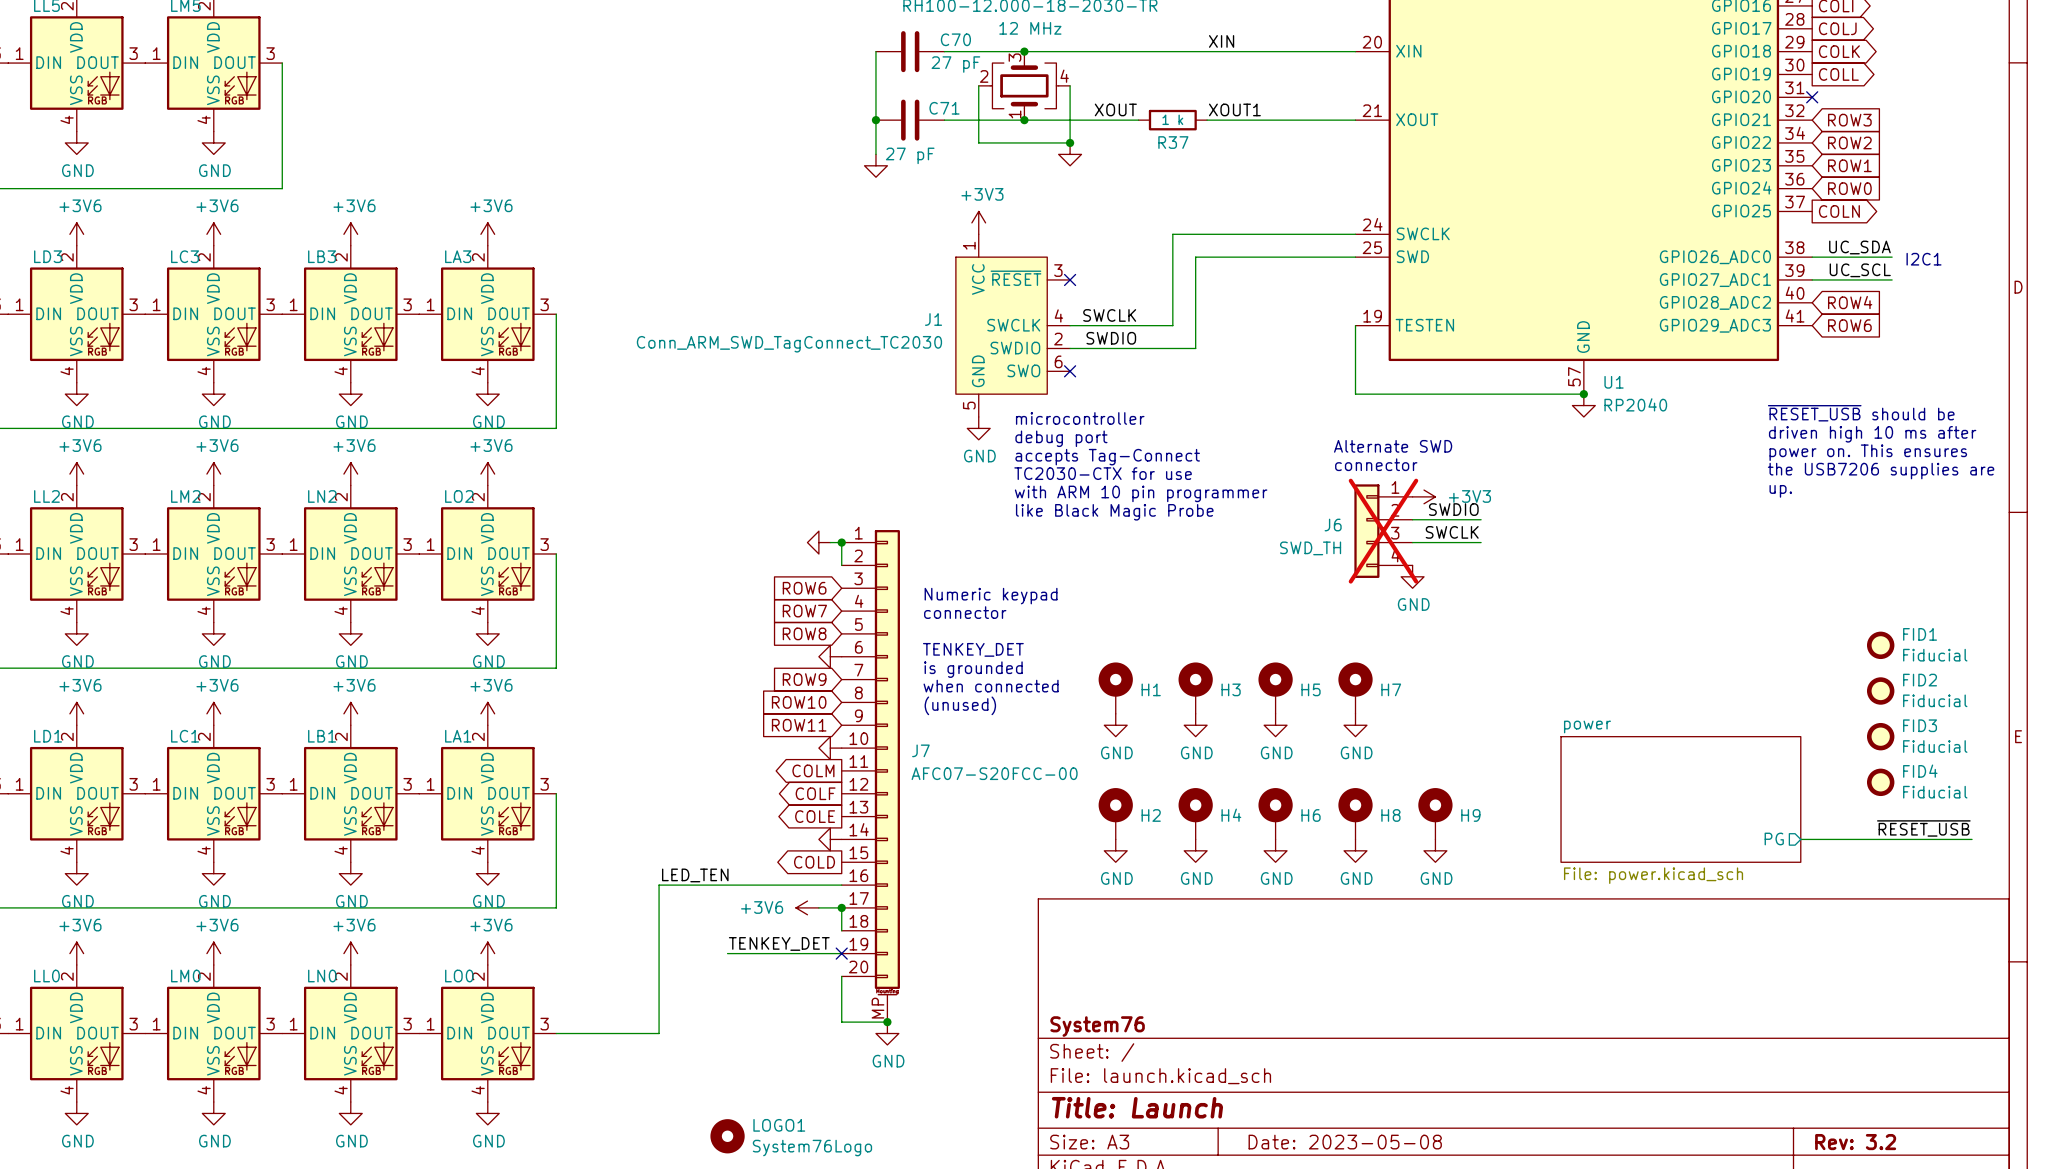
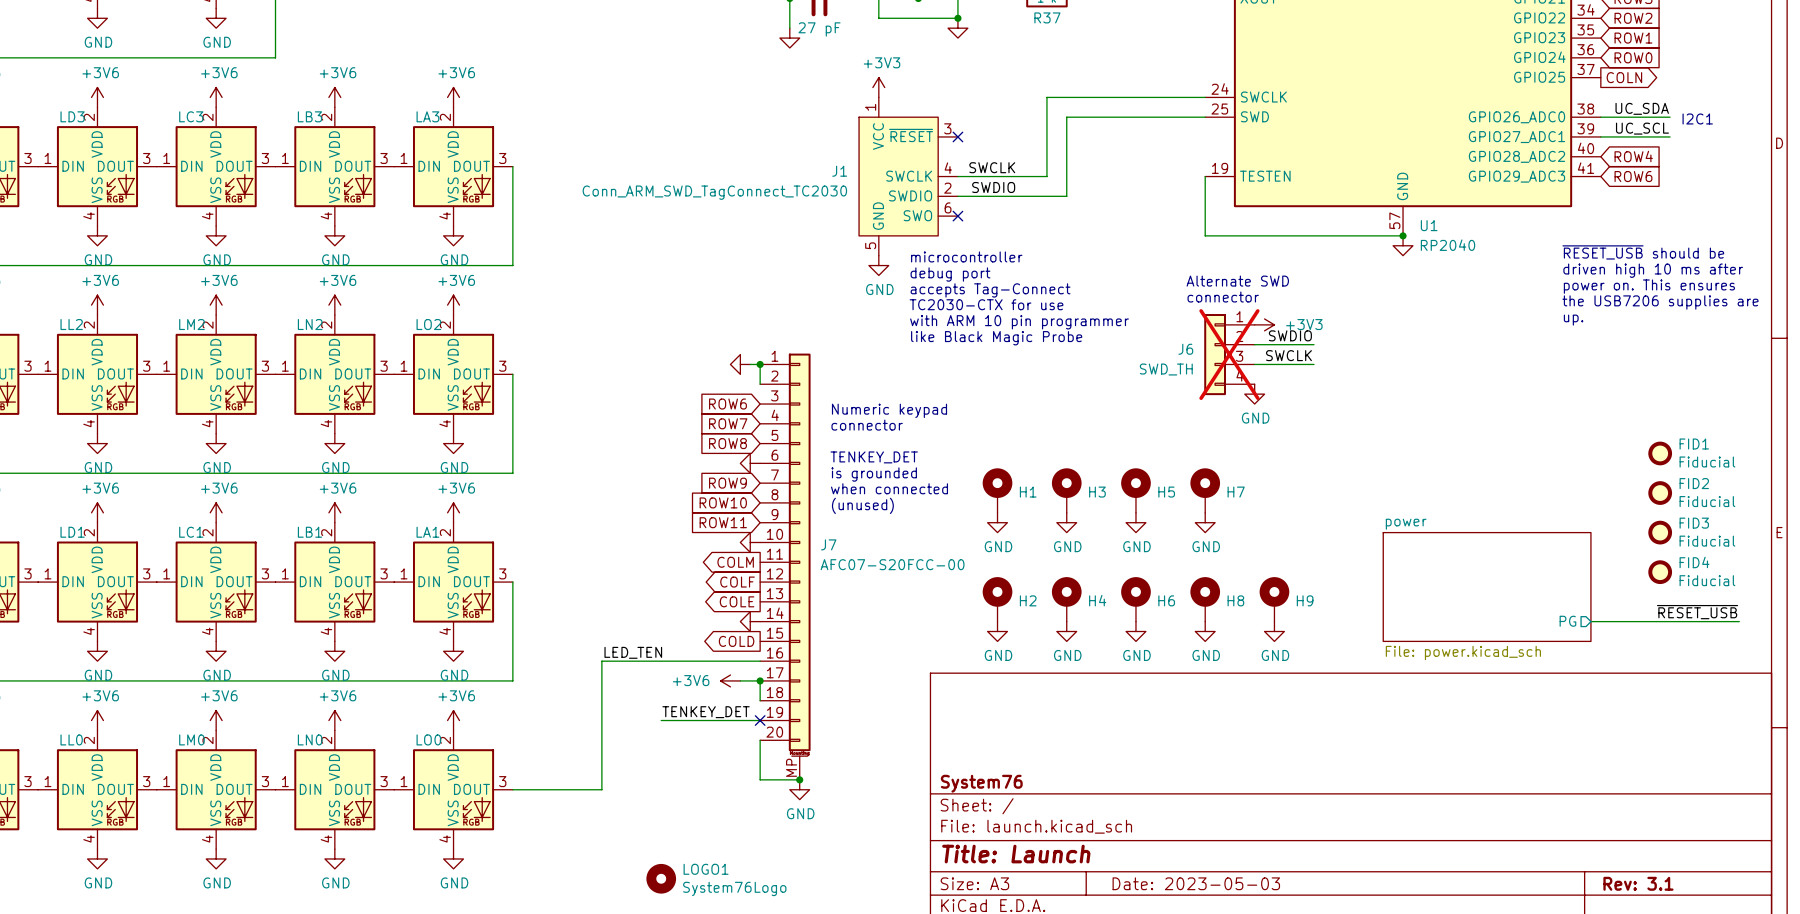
title block: Date: 2023-05-08 (1345, 1142) -> Date: 2023-05-03 (1196, 883)
title block: Rev: 3.2 (1855, 1142) -> Rev: 3.1 (1638, 883)

